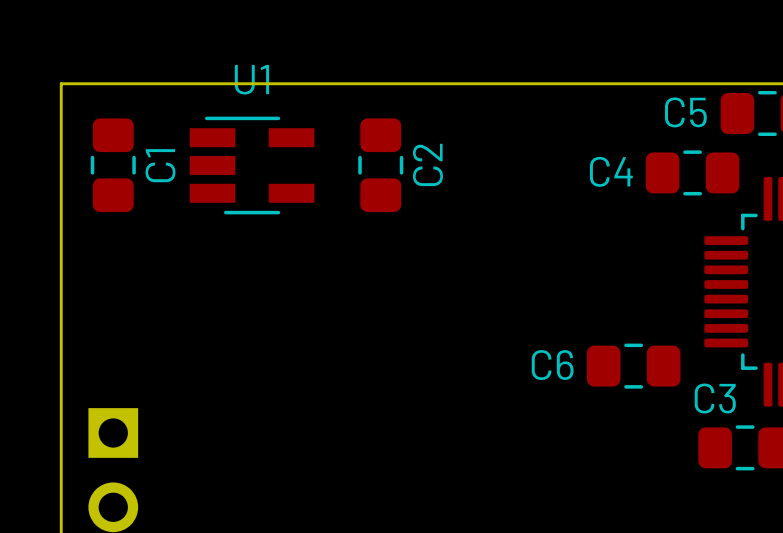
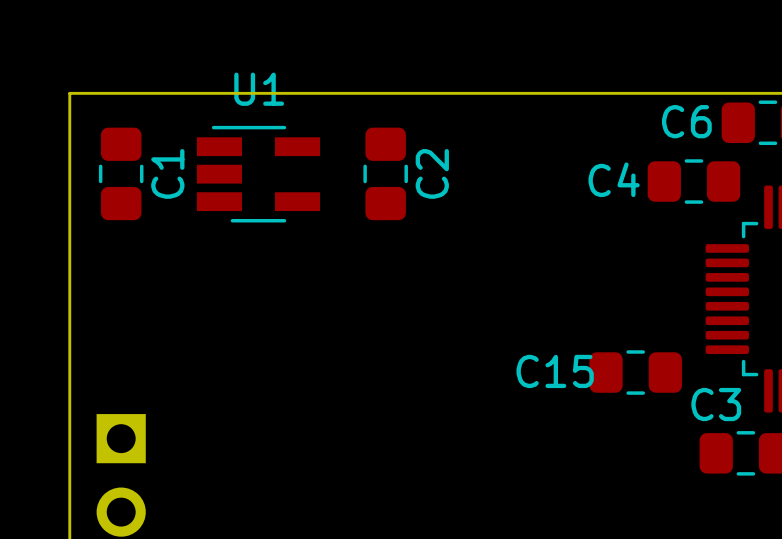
C5 name: C5 (685, 112) -> C6 (686, 121)
C6 name: C6 (552, 365) -> C15 (555, 371)

